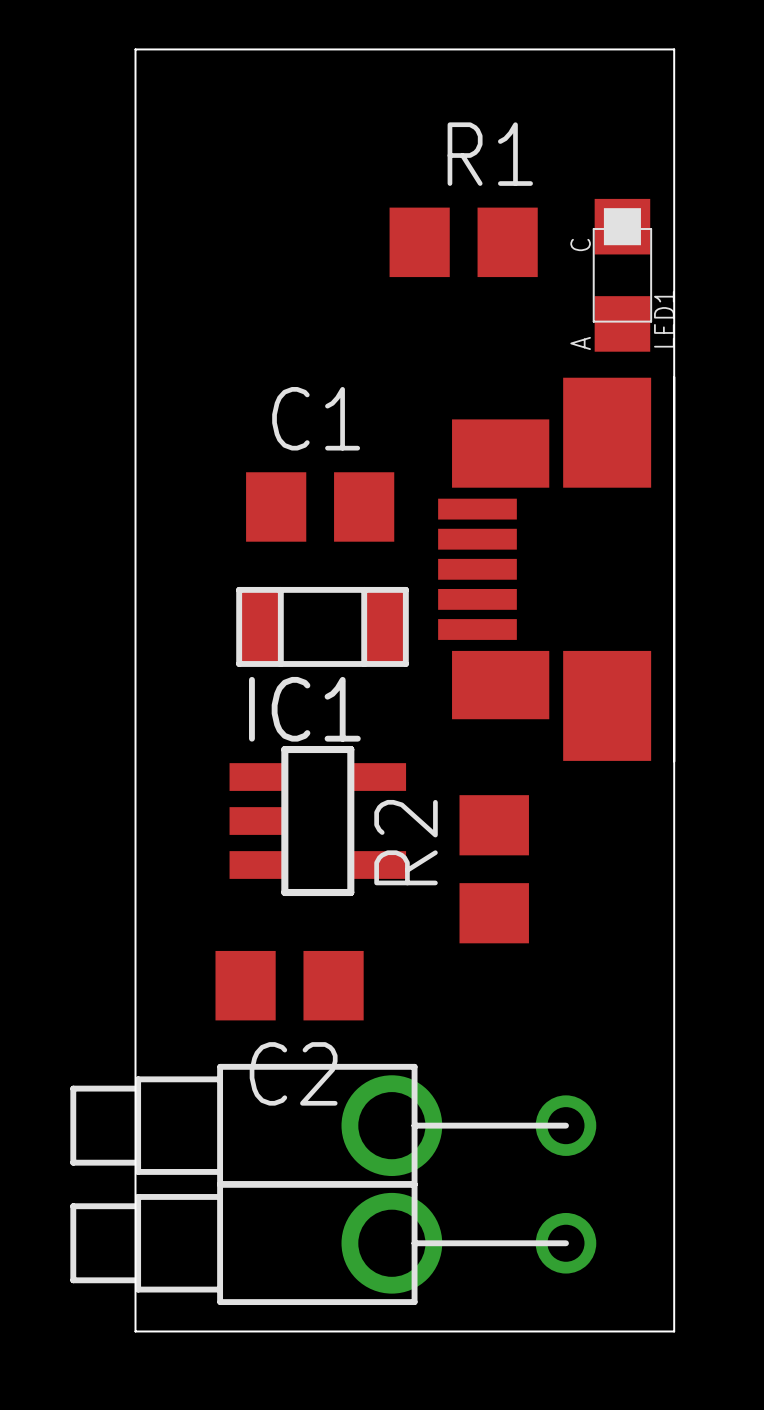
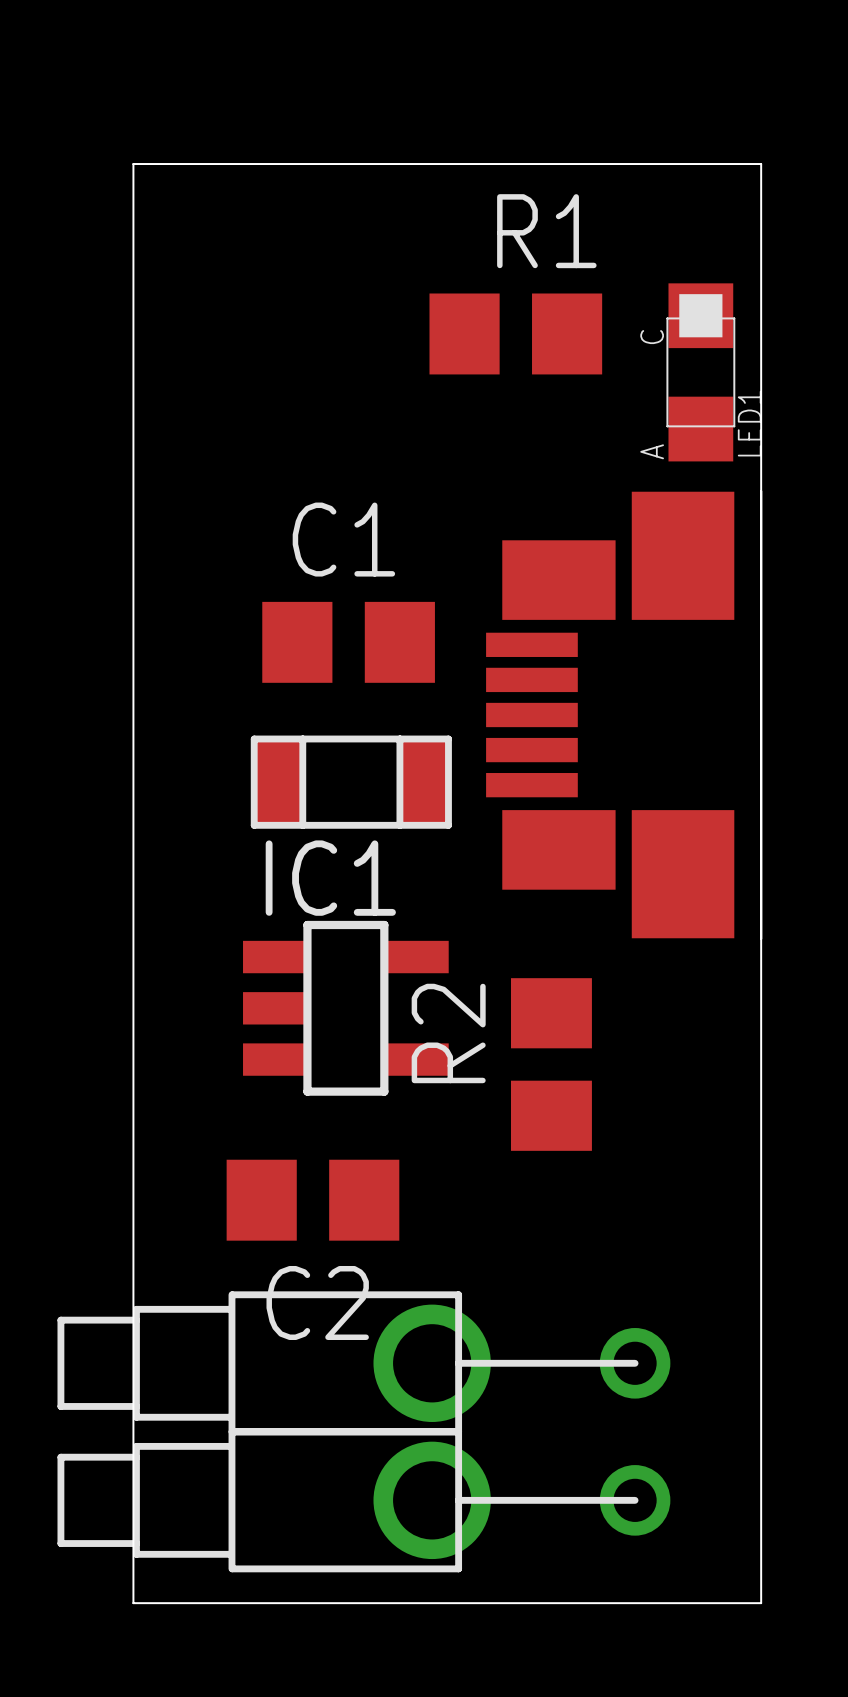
board edge: (135, 96) (135, 49) (674, 49) (674, 96) -> (133, 164) (761, 164)

